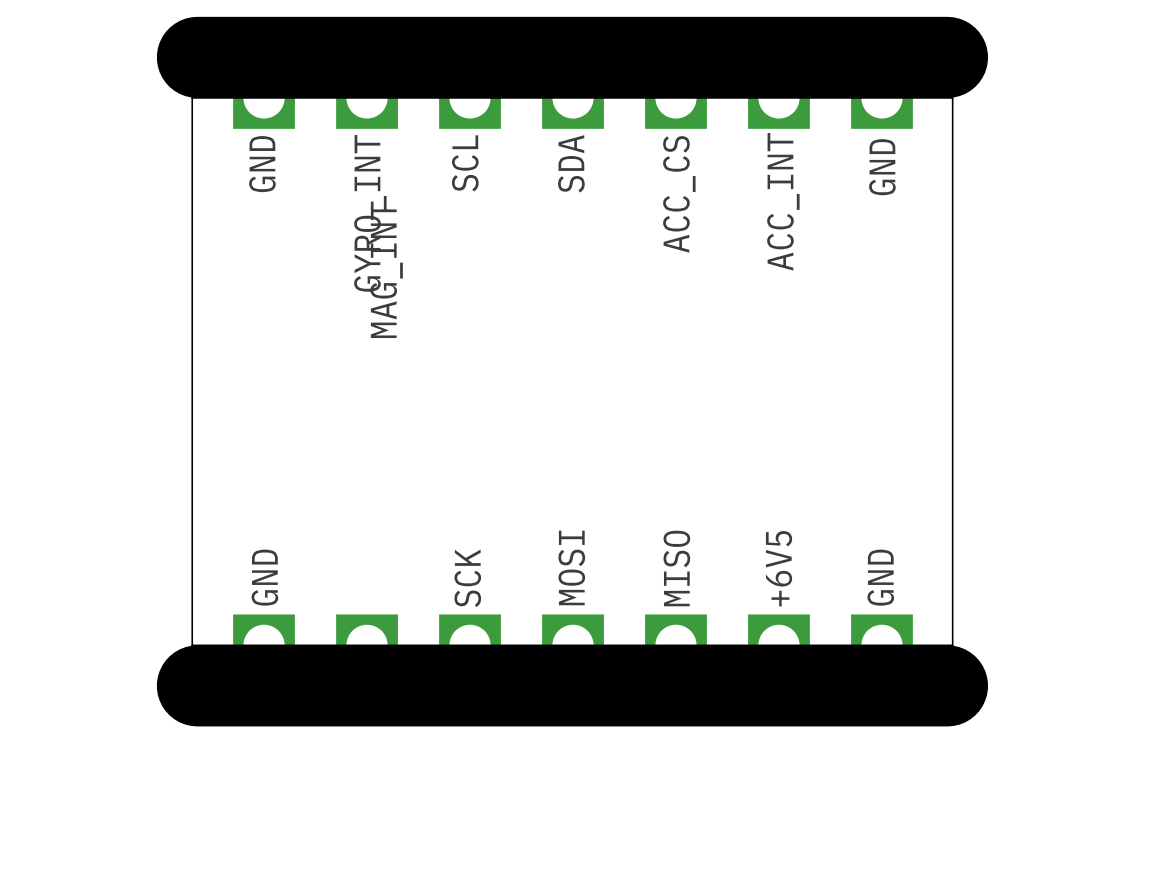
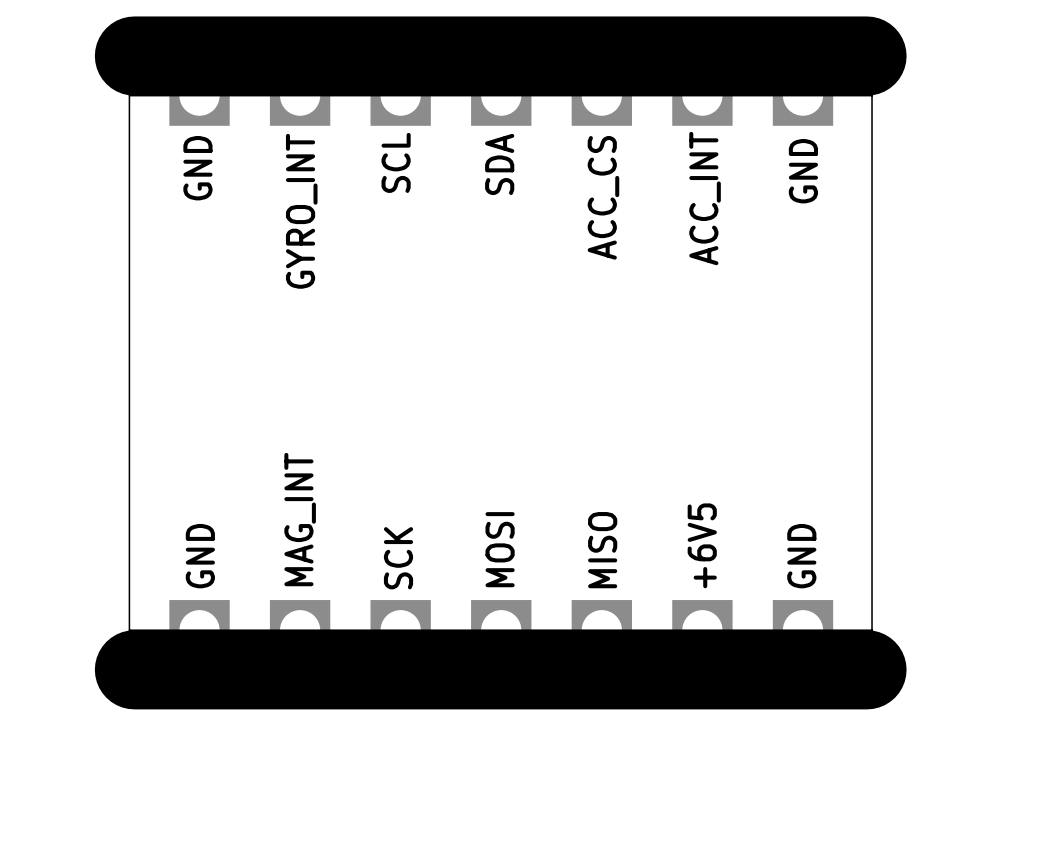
text position: MAG_INT (386, 269) -> MAG_INT (300, 519)

